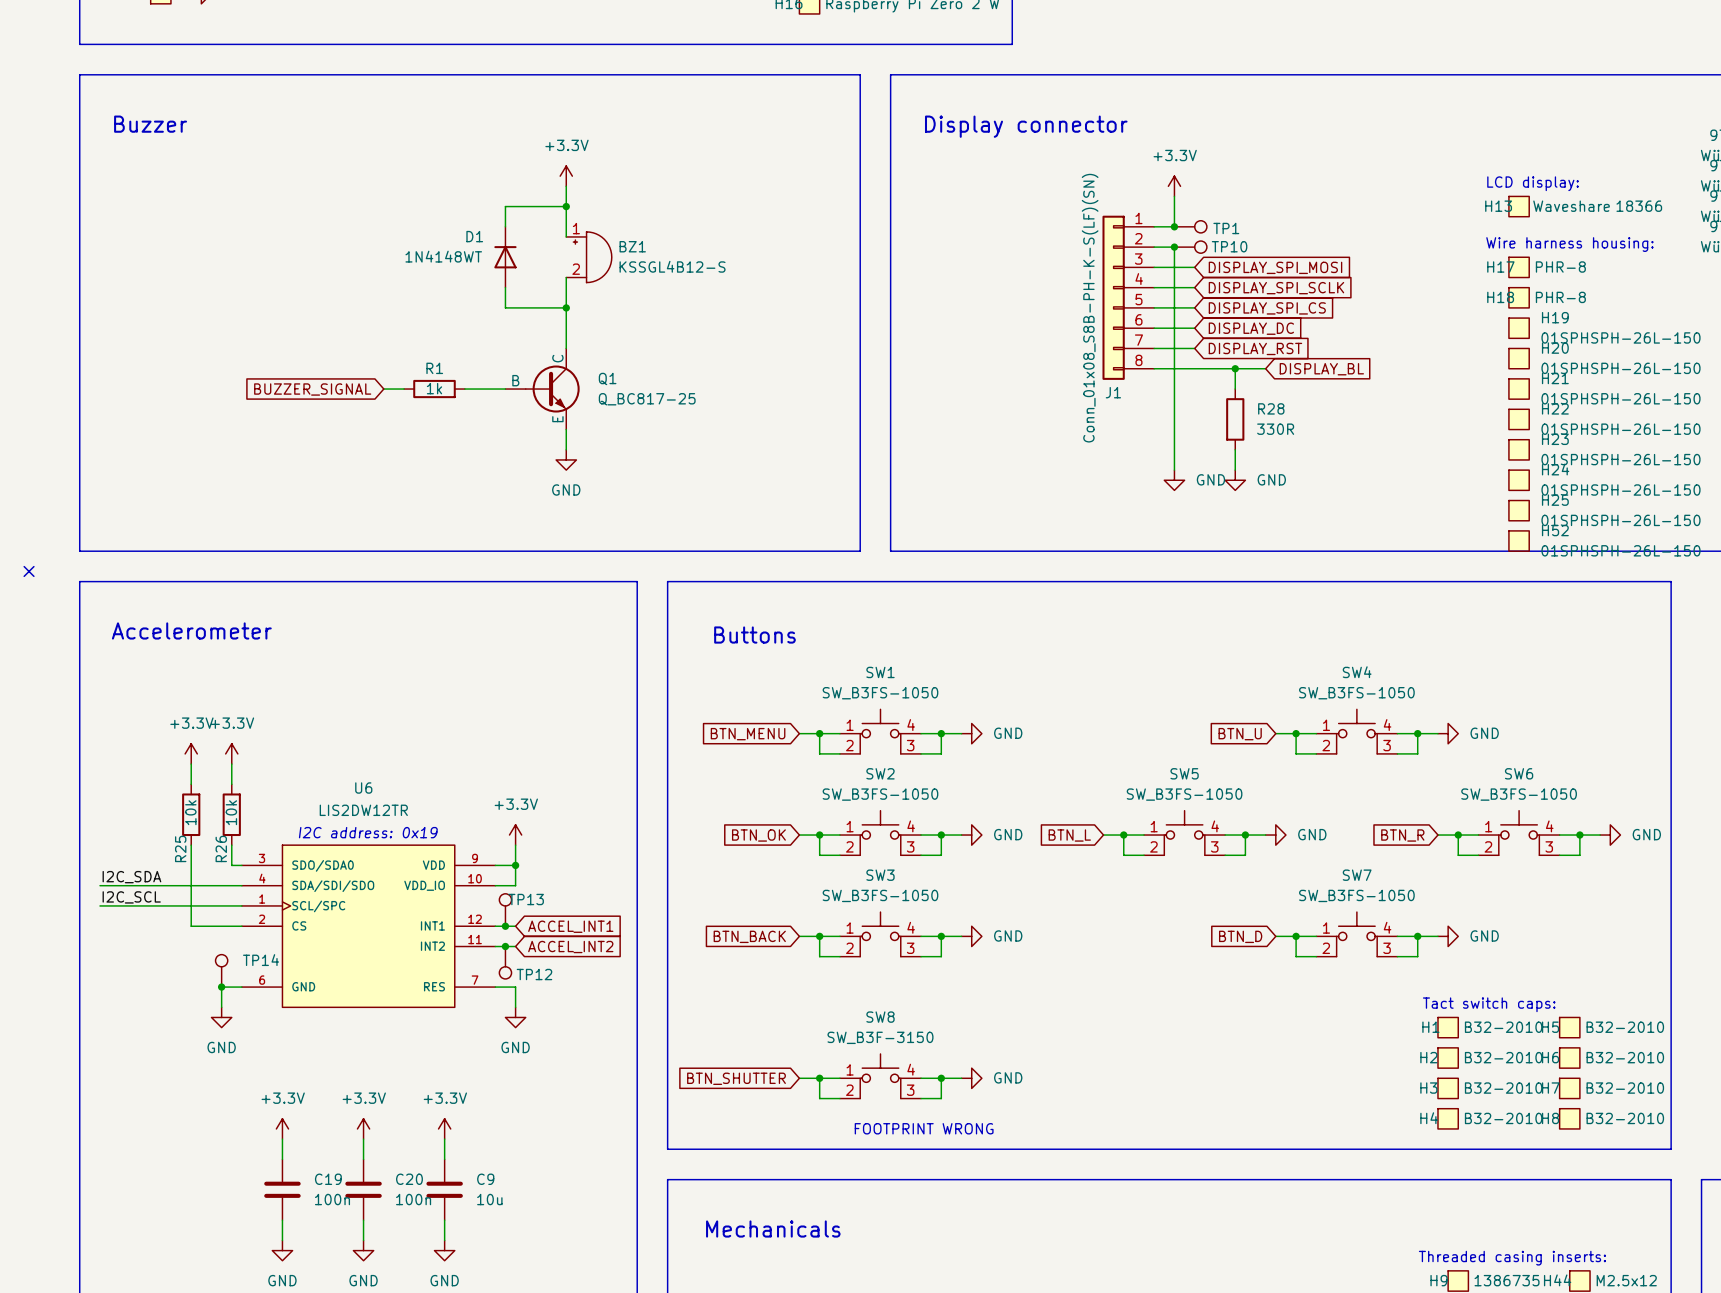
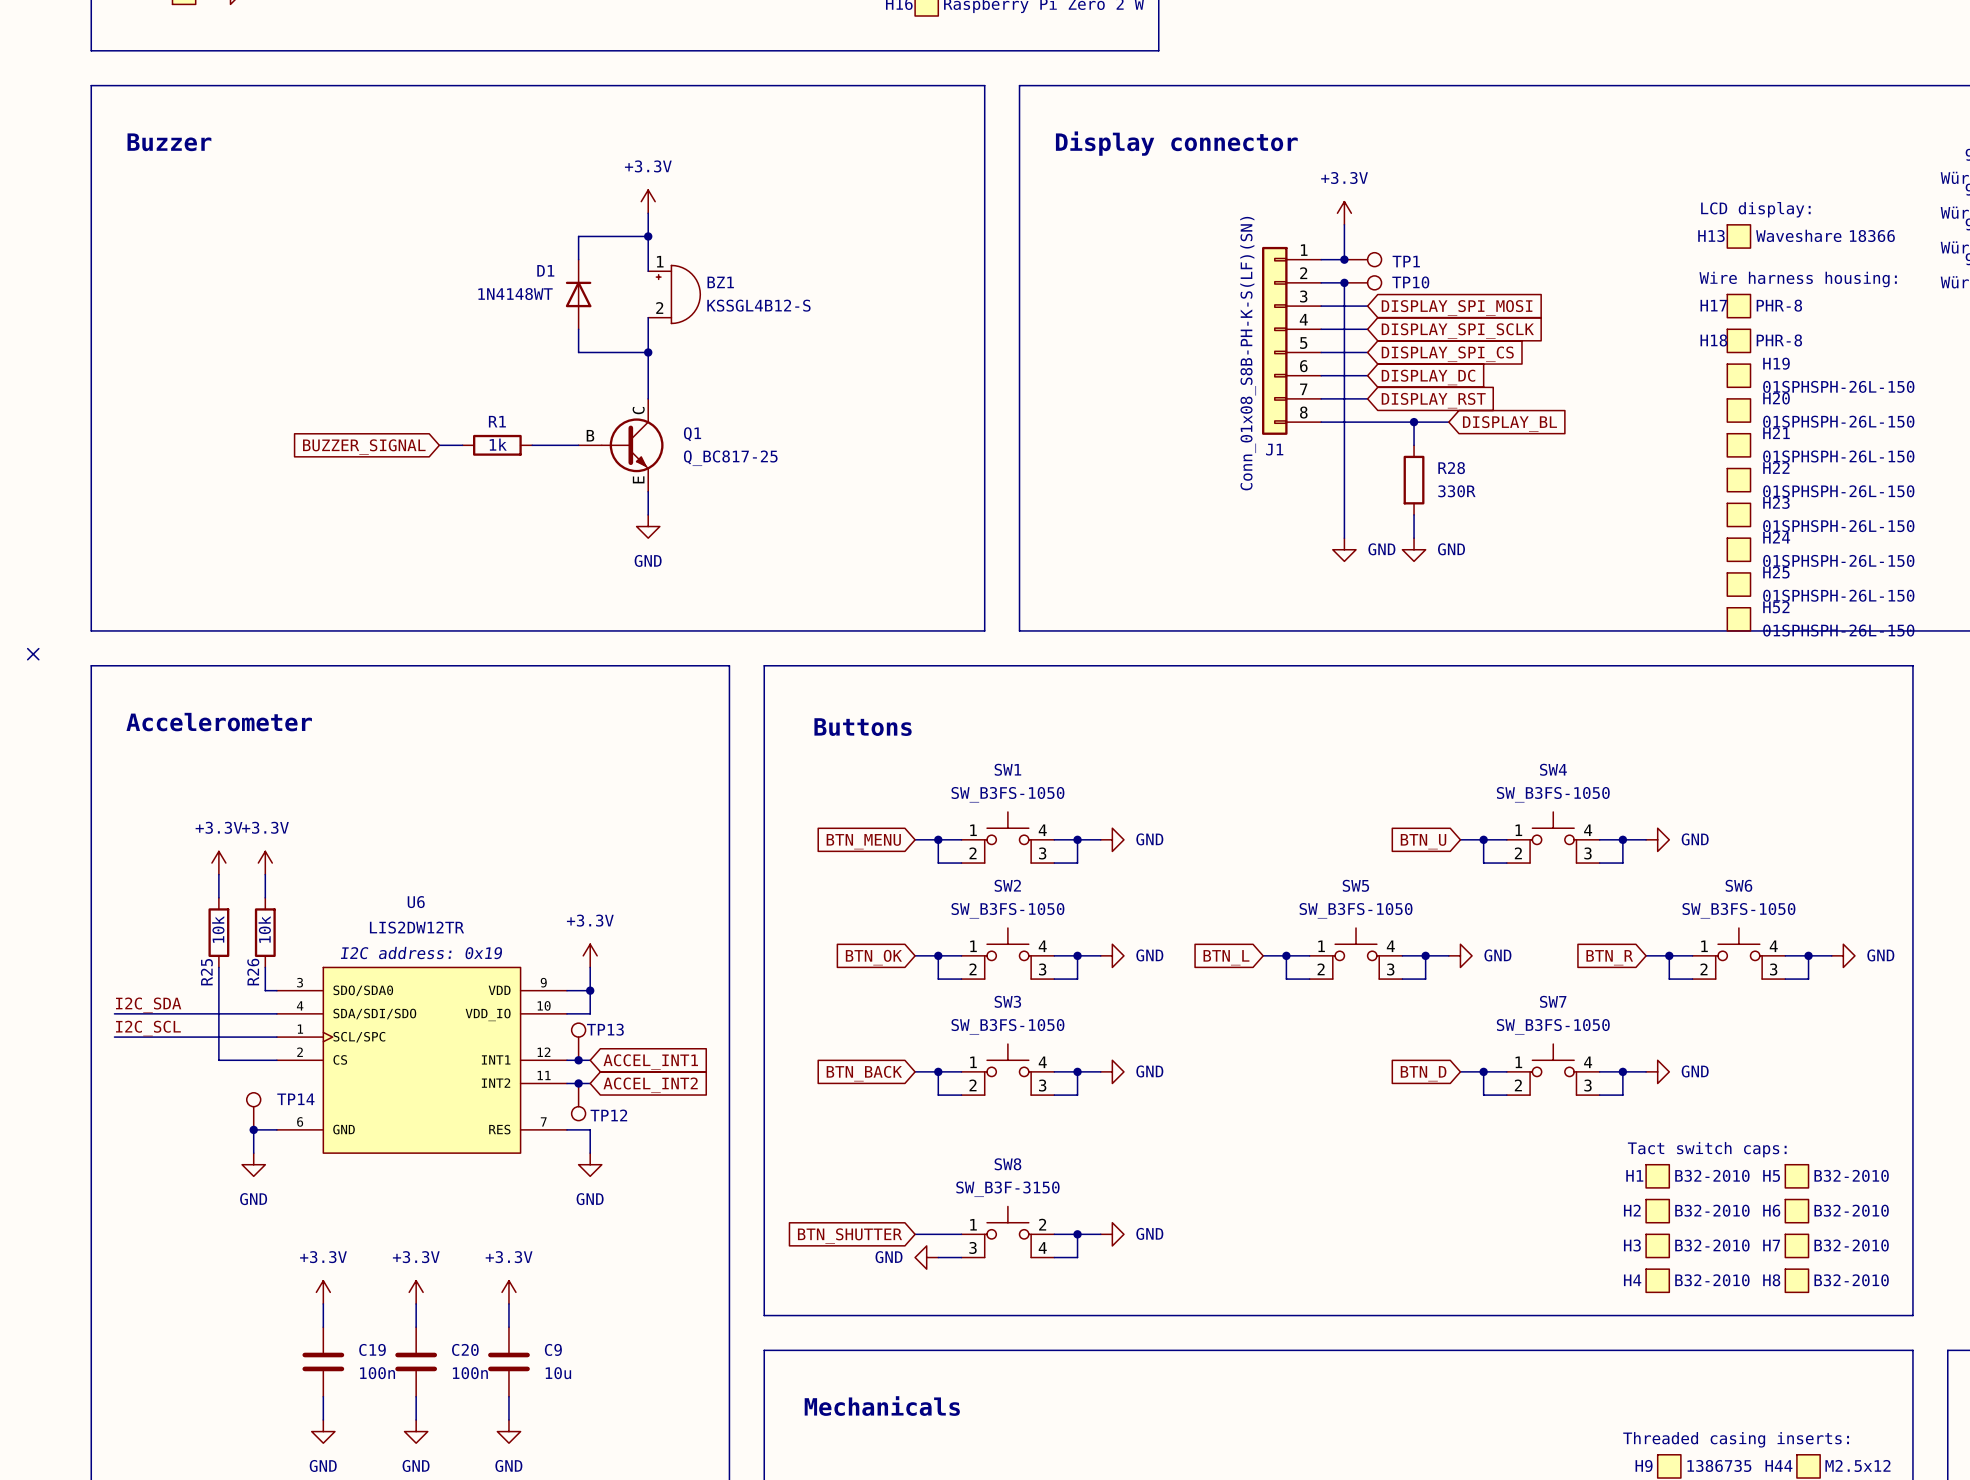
SW8 pin number: 4 (911, 1069) -> 2 (1042, 1224)
wire: (819, 1078) (819, 1098) -> none
junction: (819, 1078) -> none
SW8 pin number: 2 (849, 1090) -> 3 (973, 1247)
SW8 pin number: 3 (910, 1090) -> 4 (1042, 1247)
power symbol: none -> GND (926, 1257)
text: FOOTPRINT WRONG (924, 1128) -> none

